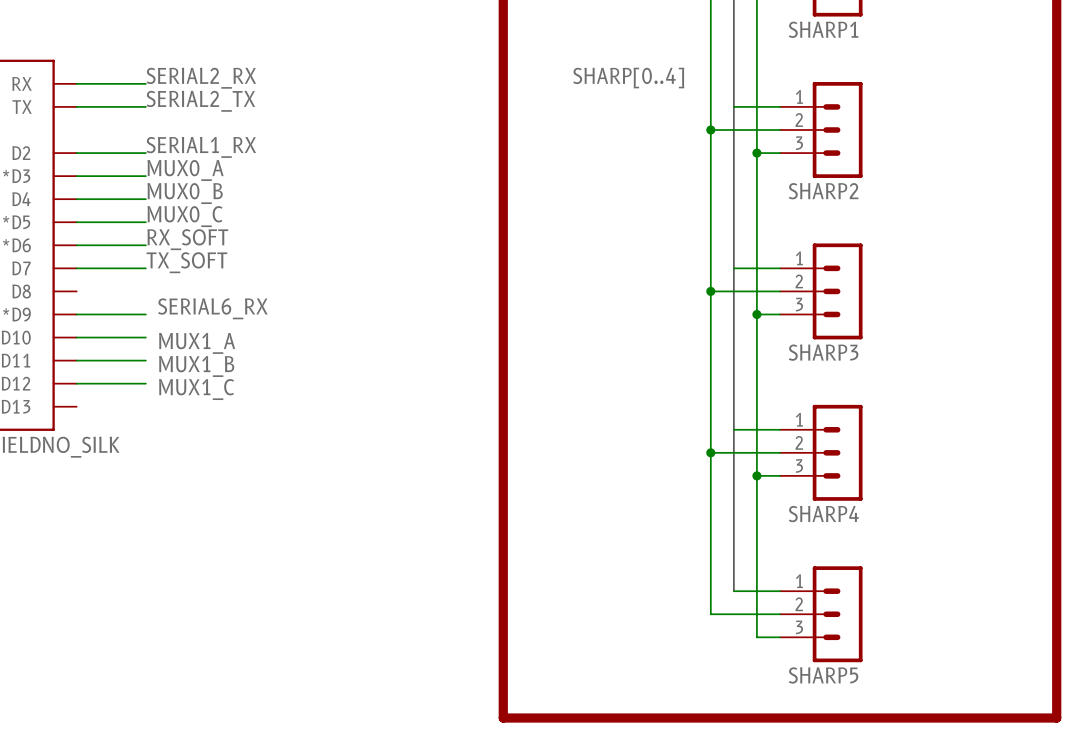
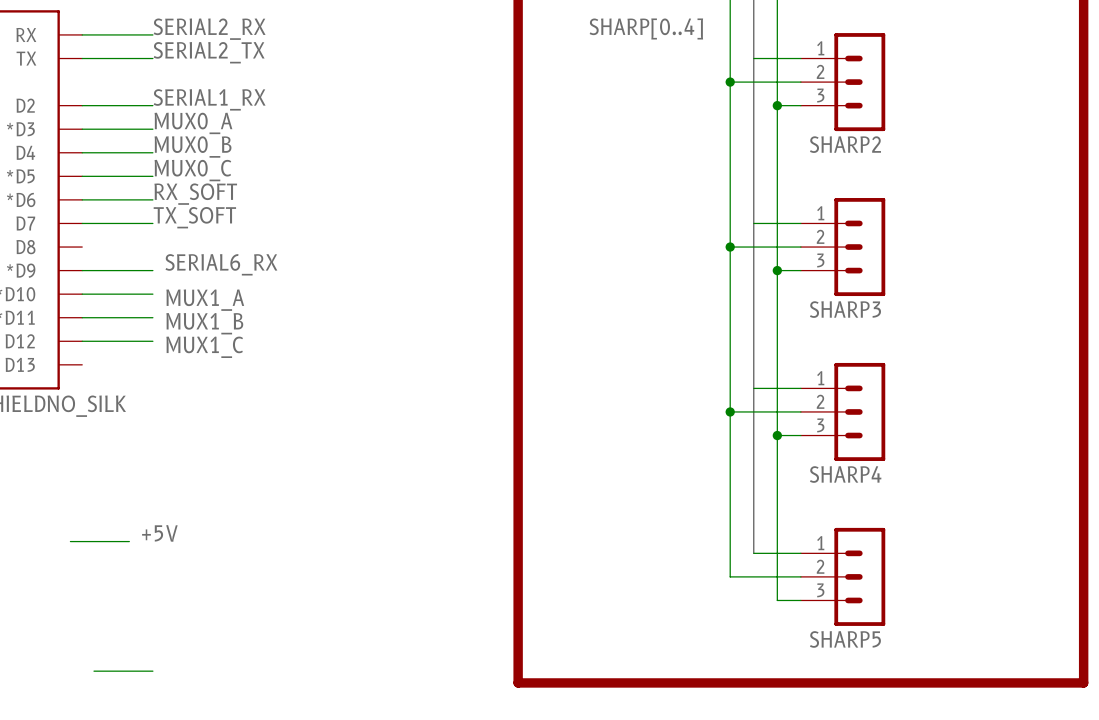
label: none -> +5V (159, 533)
wire: none -> (70, 541) (129, 541)
wire: none -> (93, 671) (152, 671)

